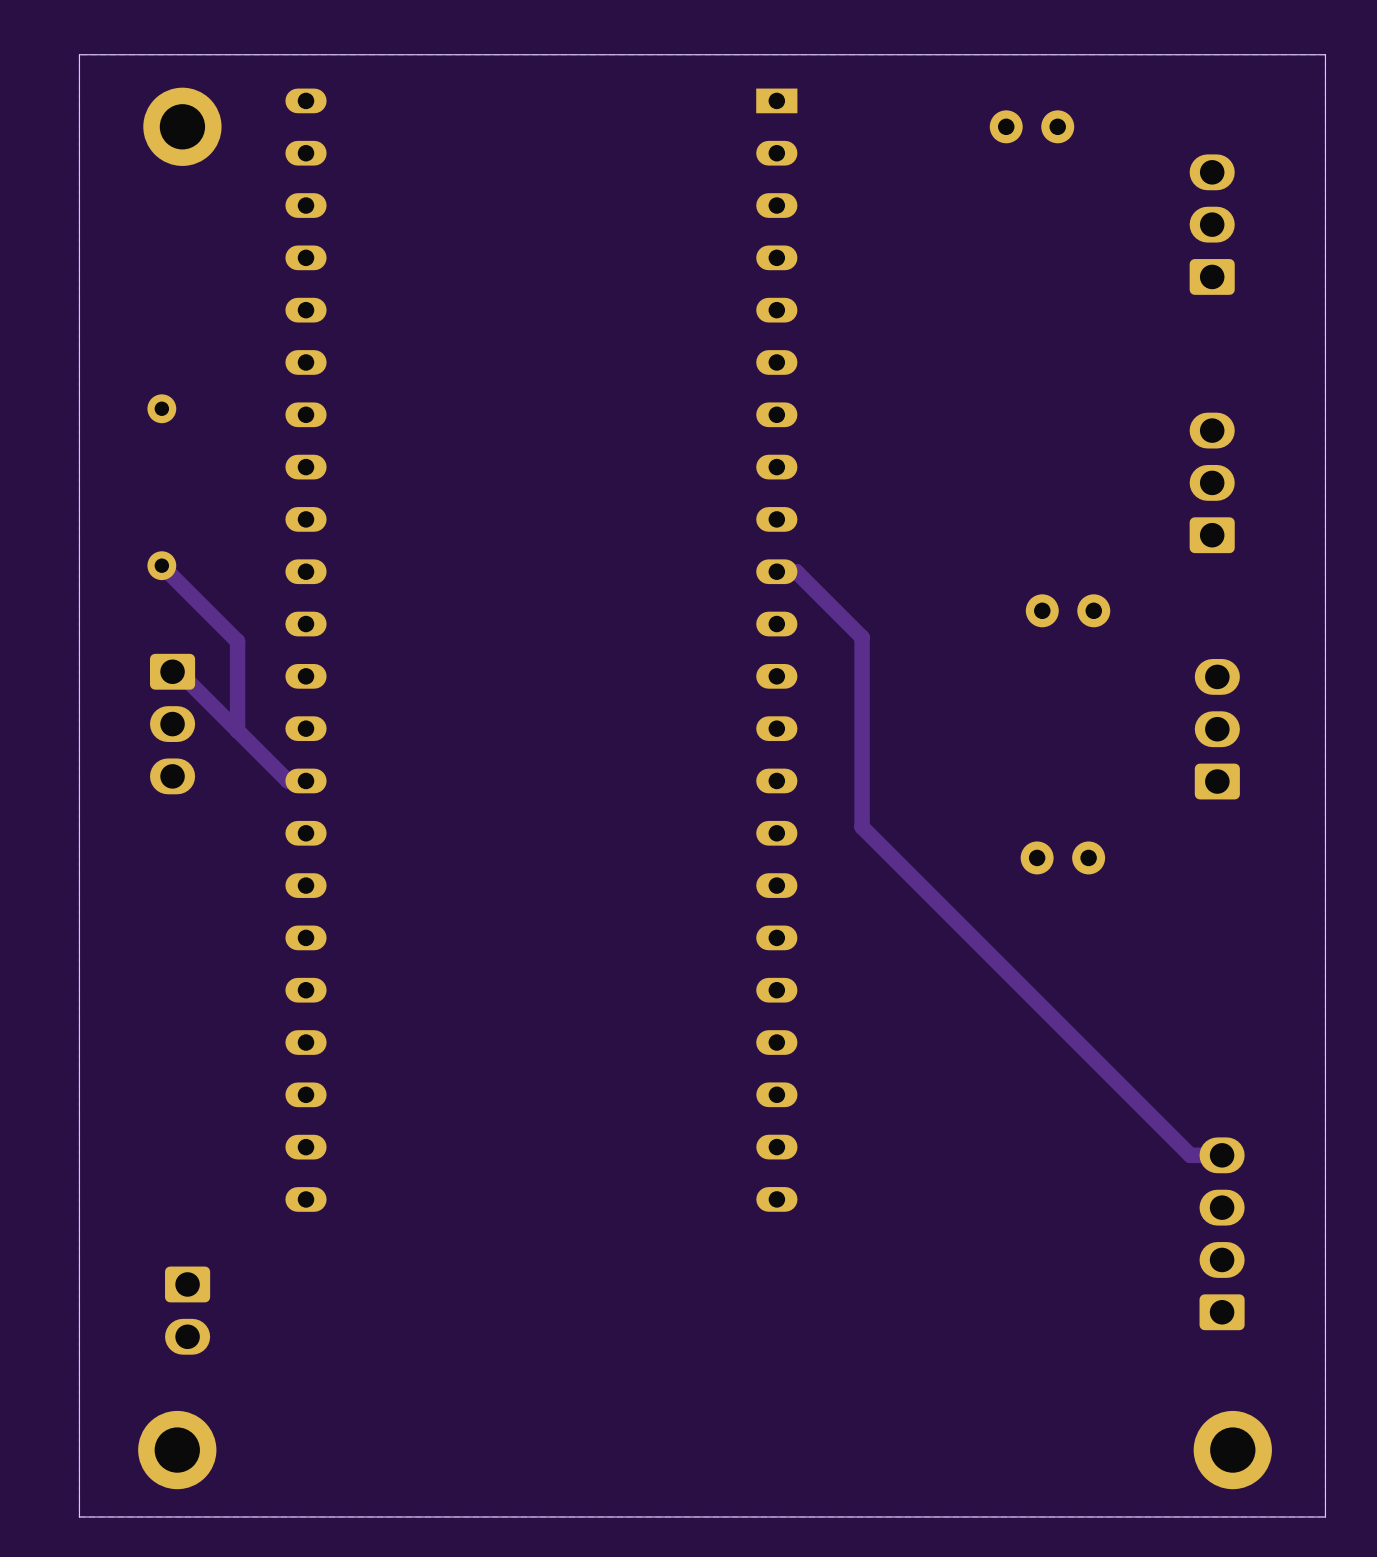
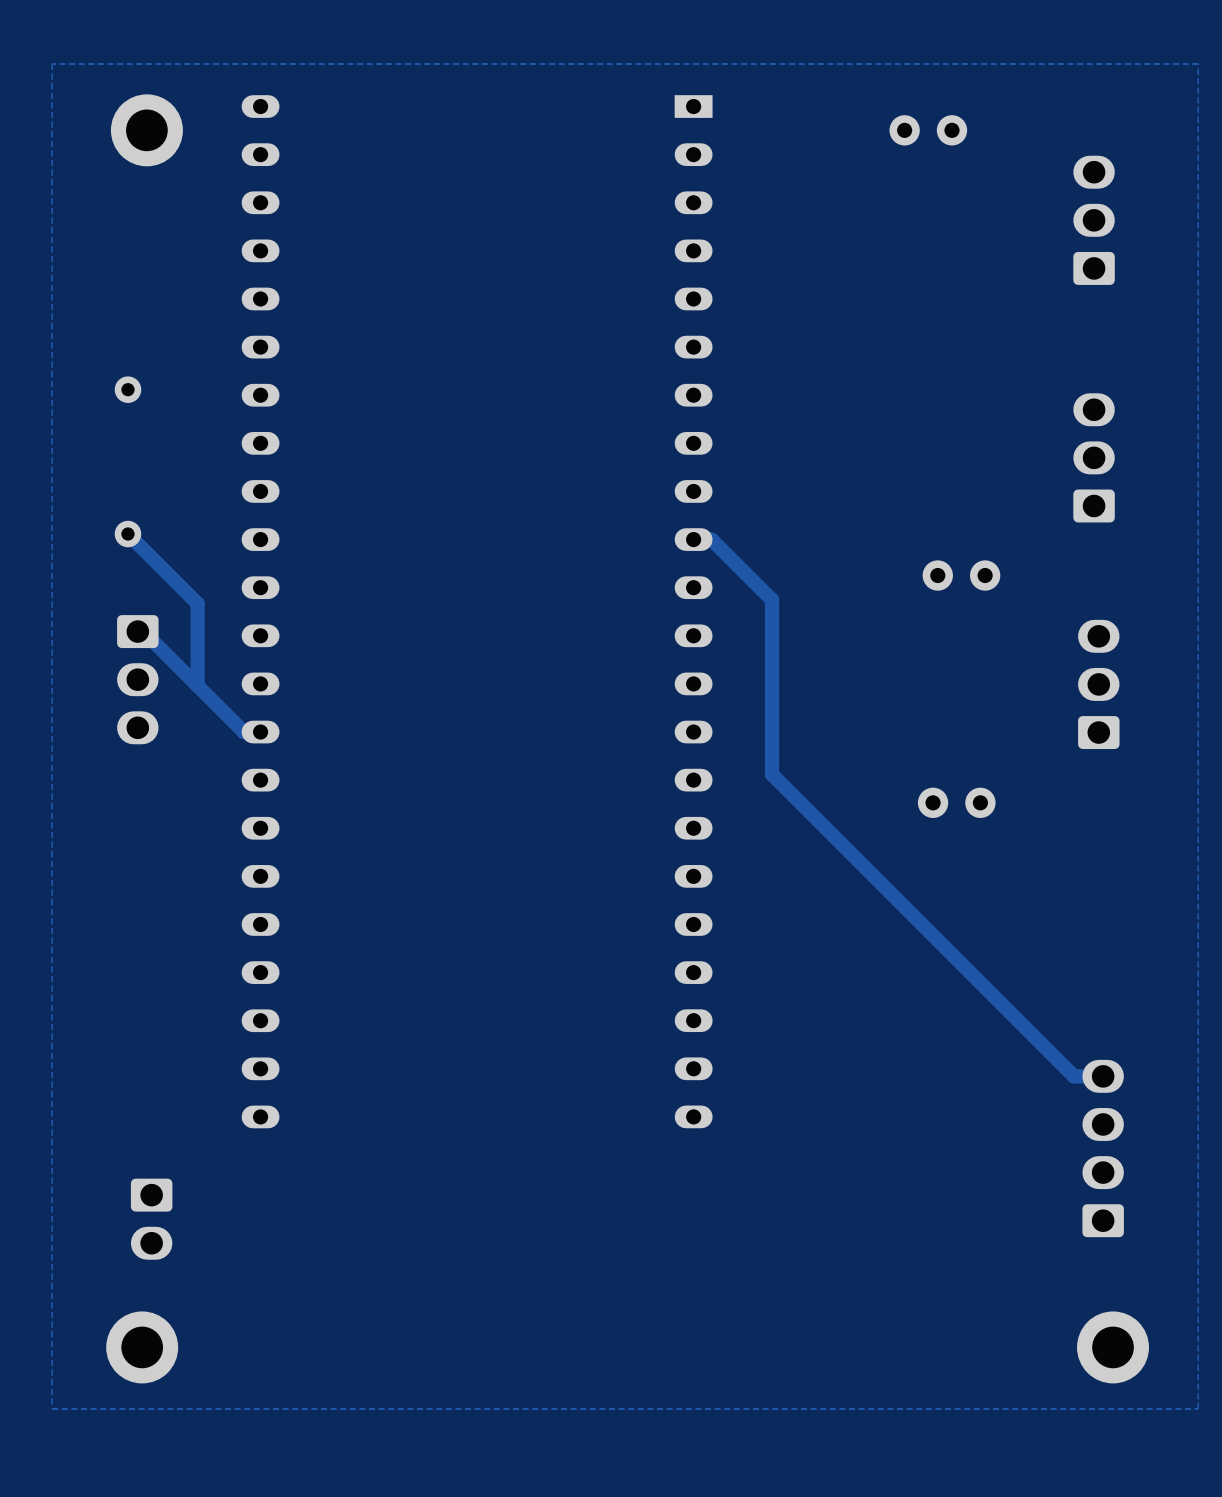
board edge: (1325, 54) (79, 54) (79, 1516) (1325, 1516) (1325, 54) -> none

